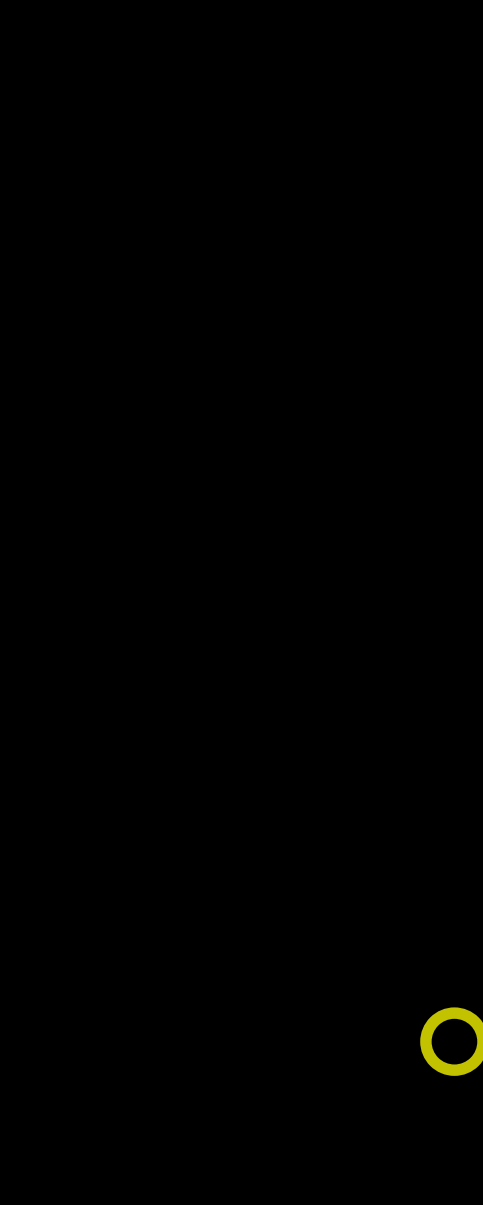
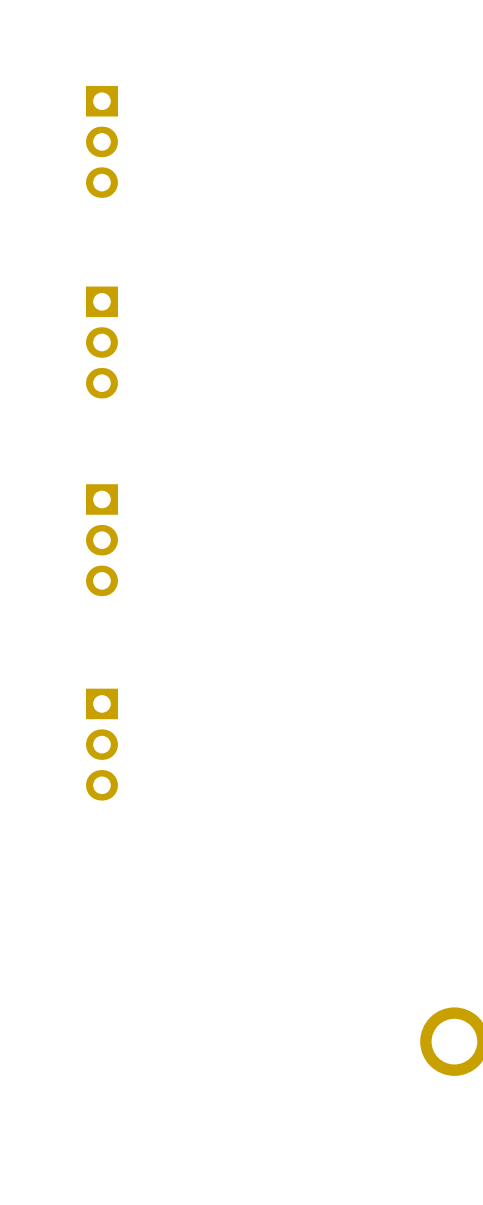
part: none -> (101, 141)
part: none -> (101, 342)
part: none -> (101, 540)
part: none -> (101, 744)

